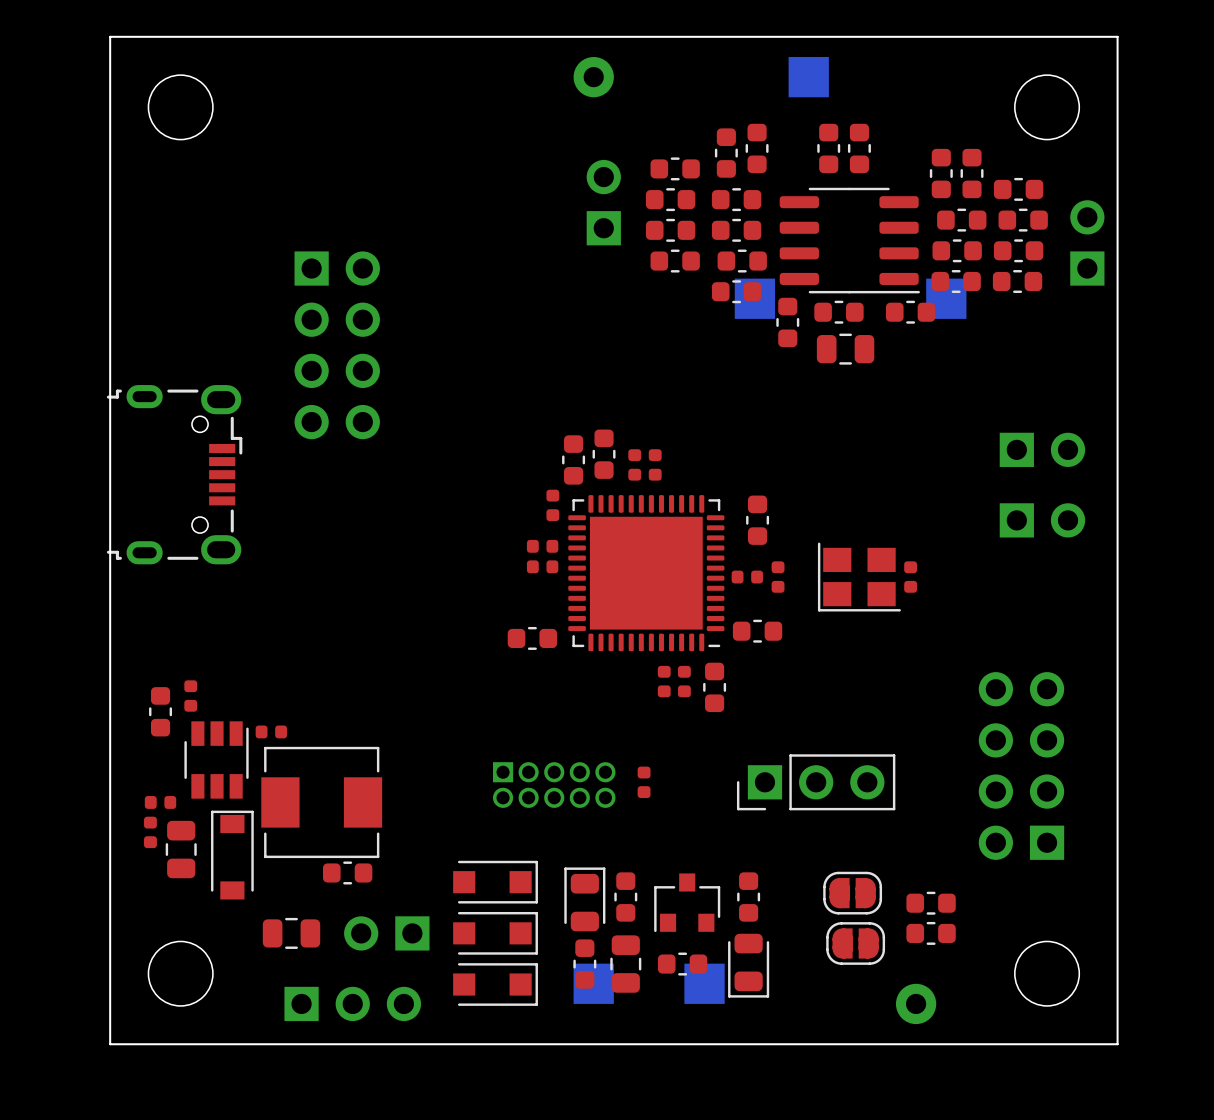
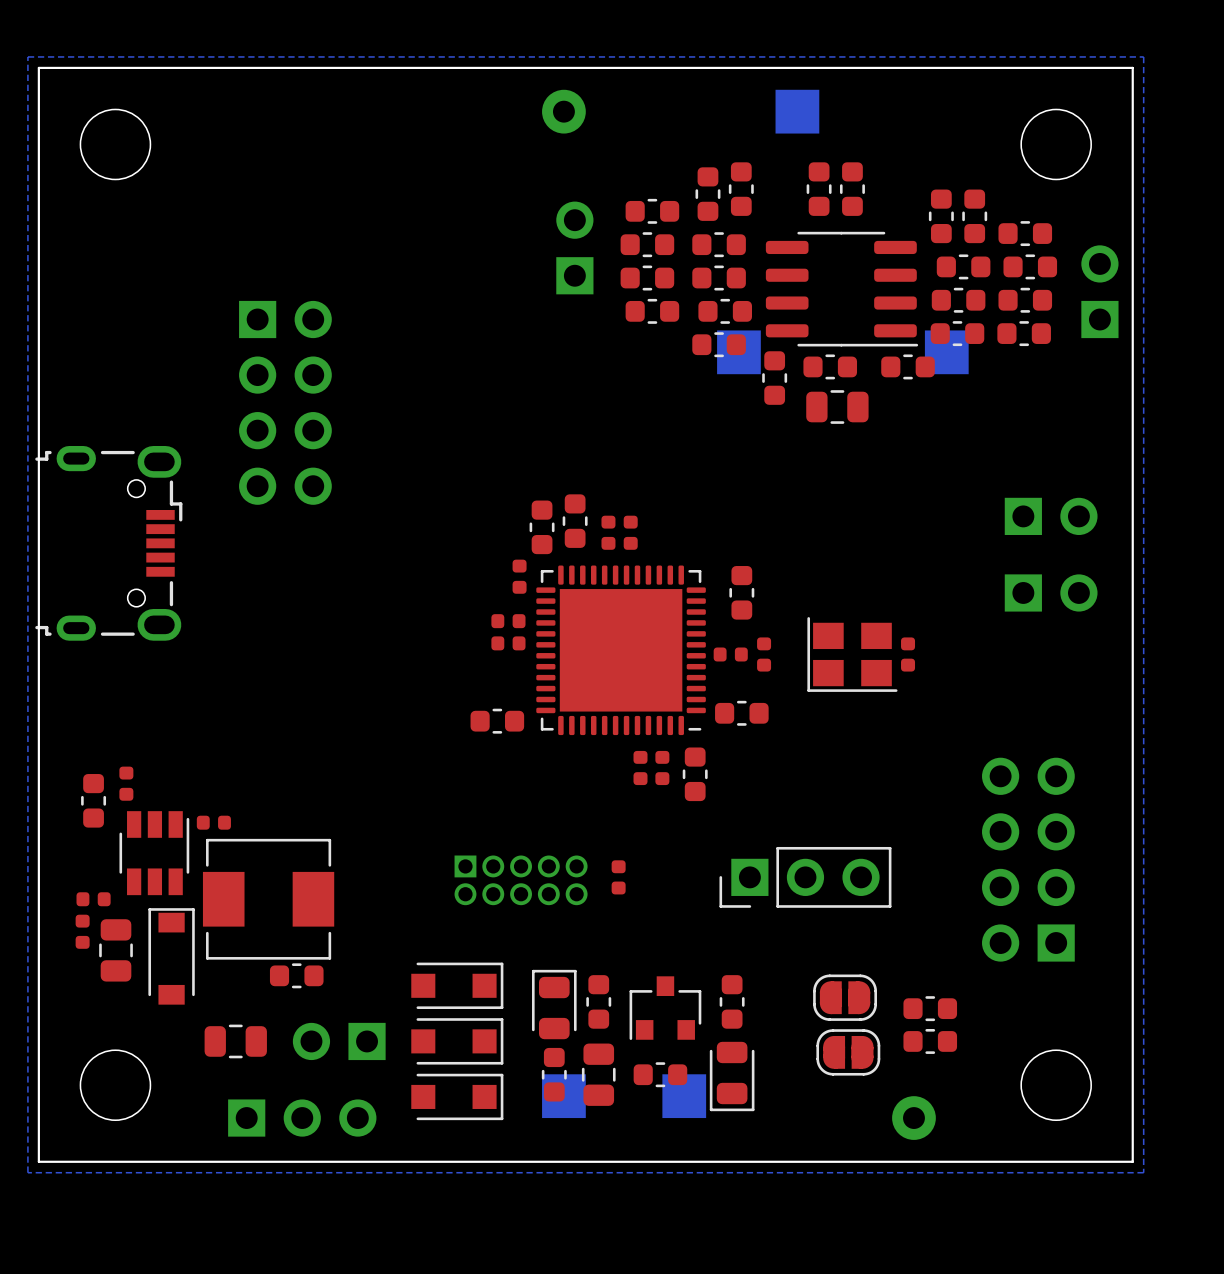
bottom zone outline: none -> (27, 56) (27, 1172) (1143, 1172) (1143, 56) (27, 56)

